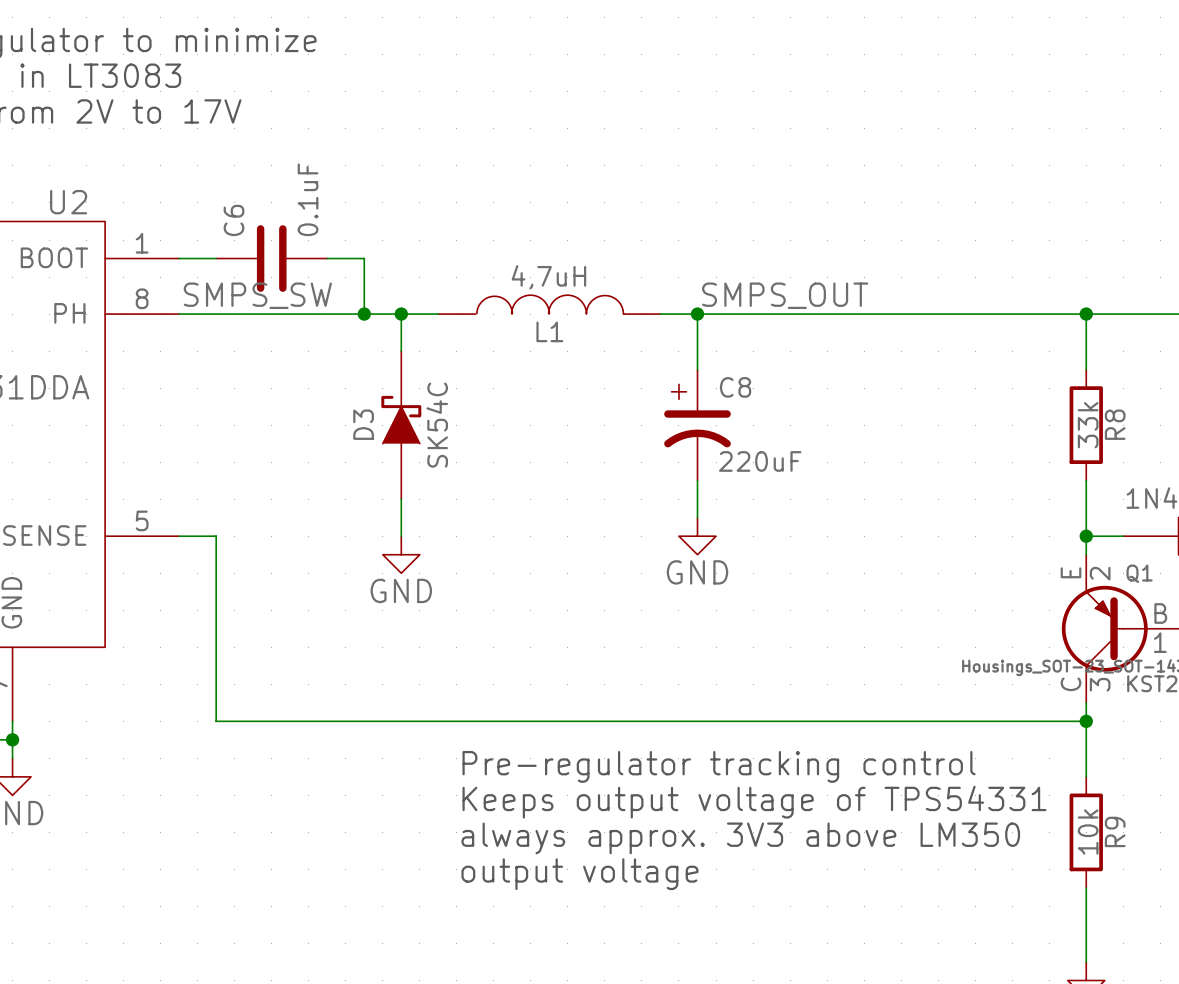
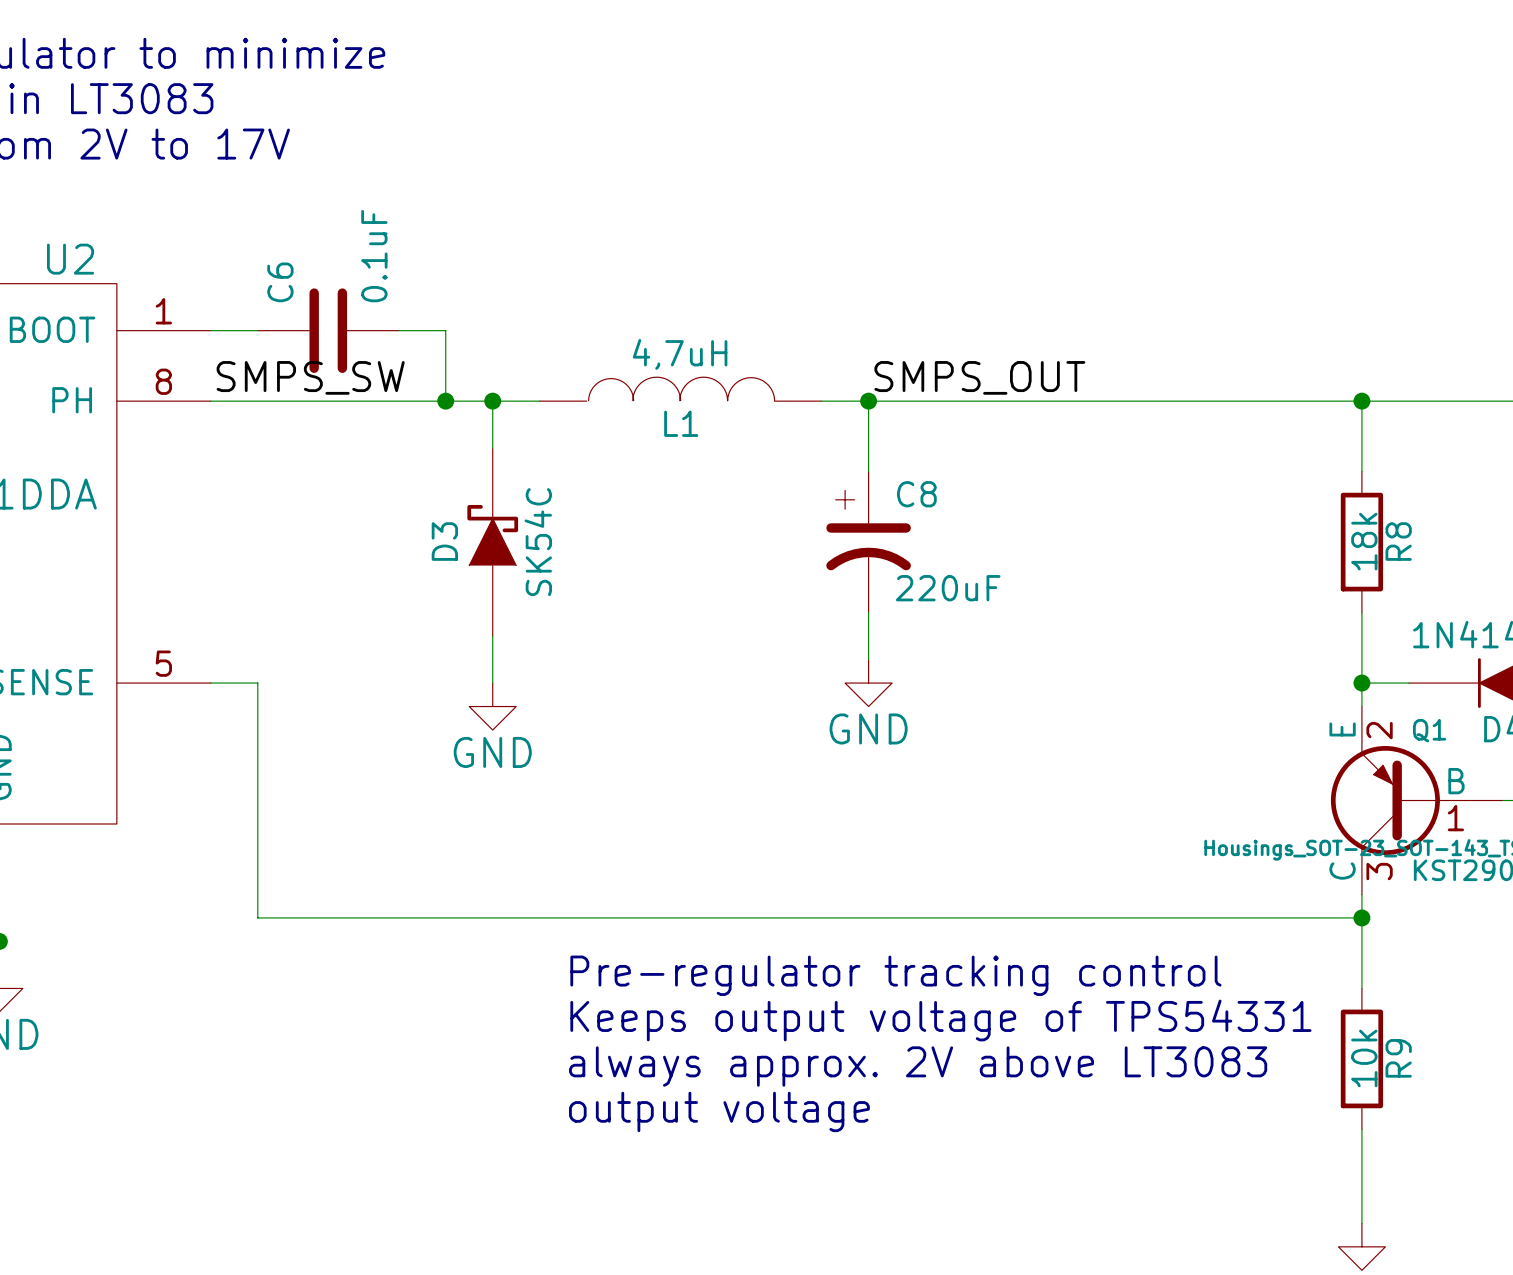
R8 value: 33k (1088, 425) -> 18k (1364, 541)
text: always approx. 3V3 above LM350 (740, 838) -> always approx. 2V above LT3083 (918, 1066)

